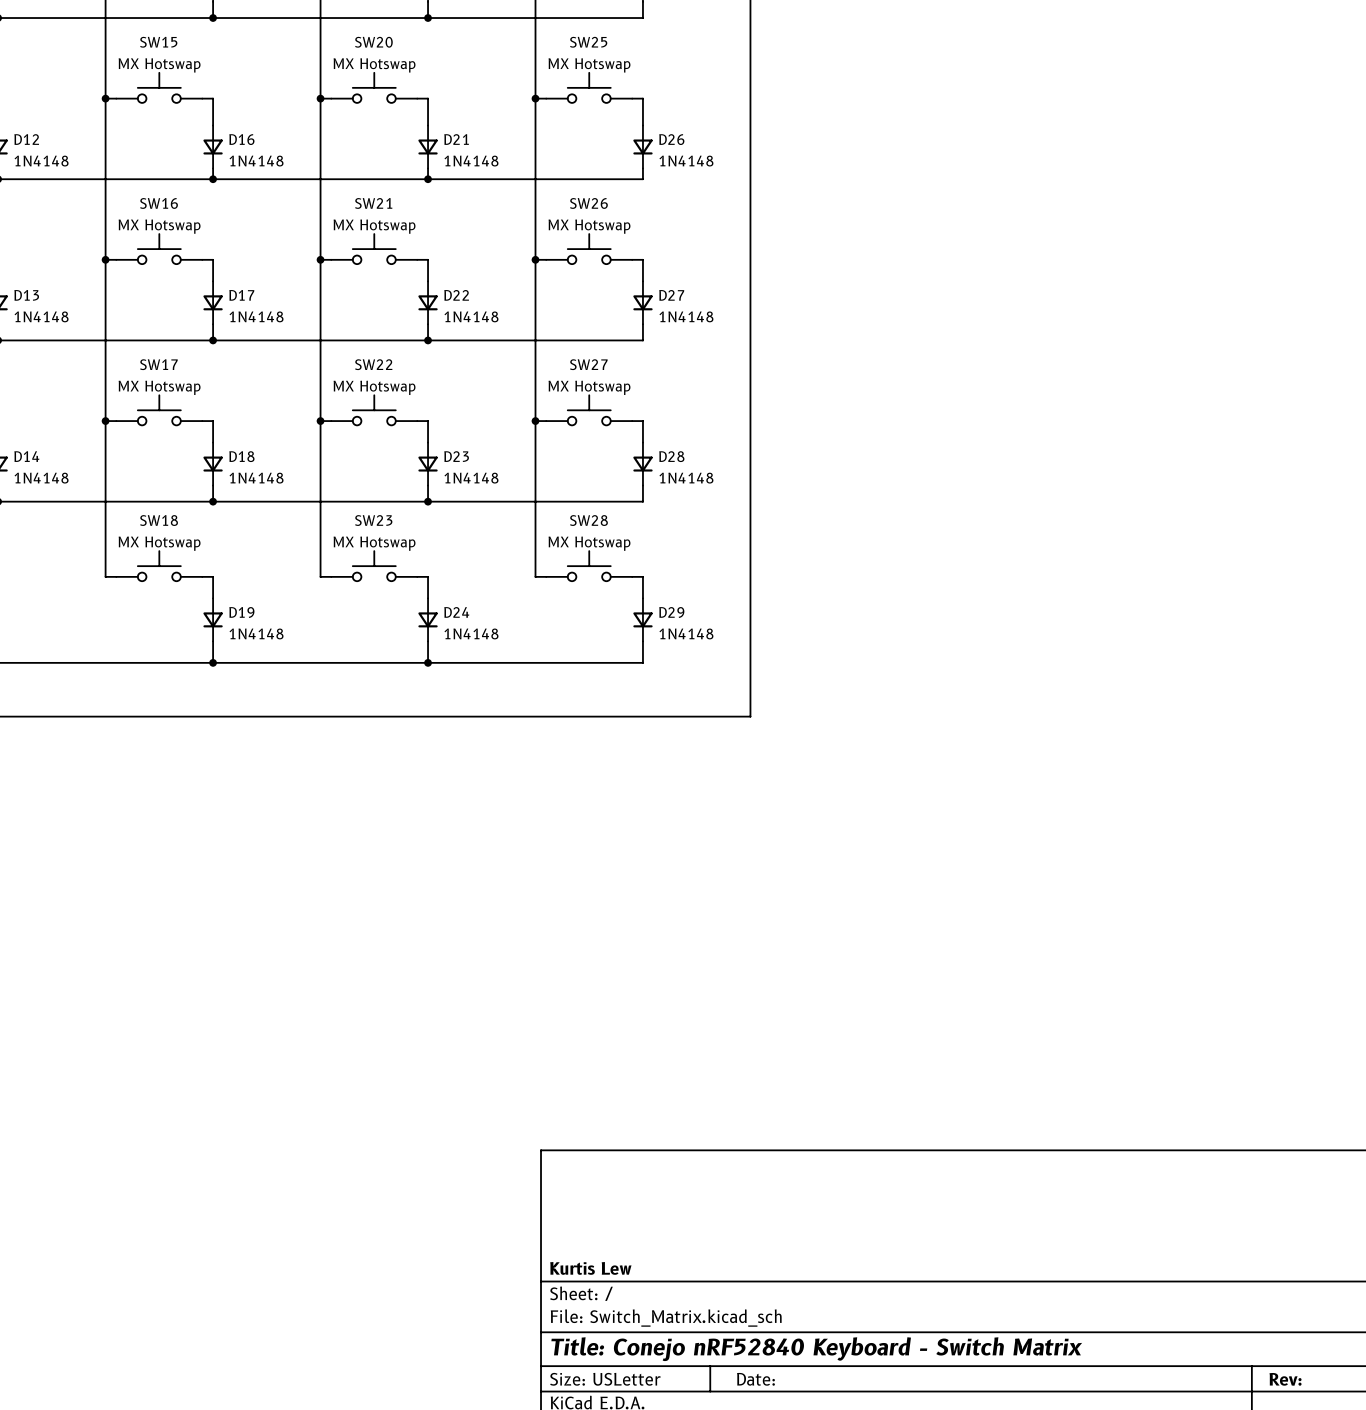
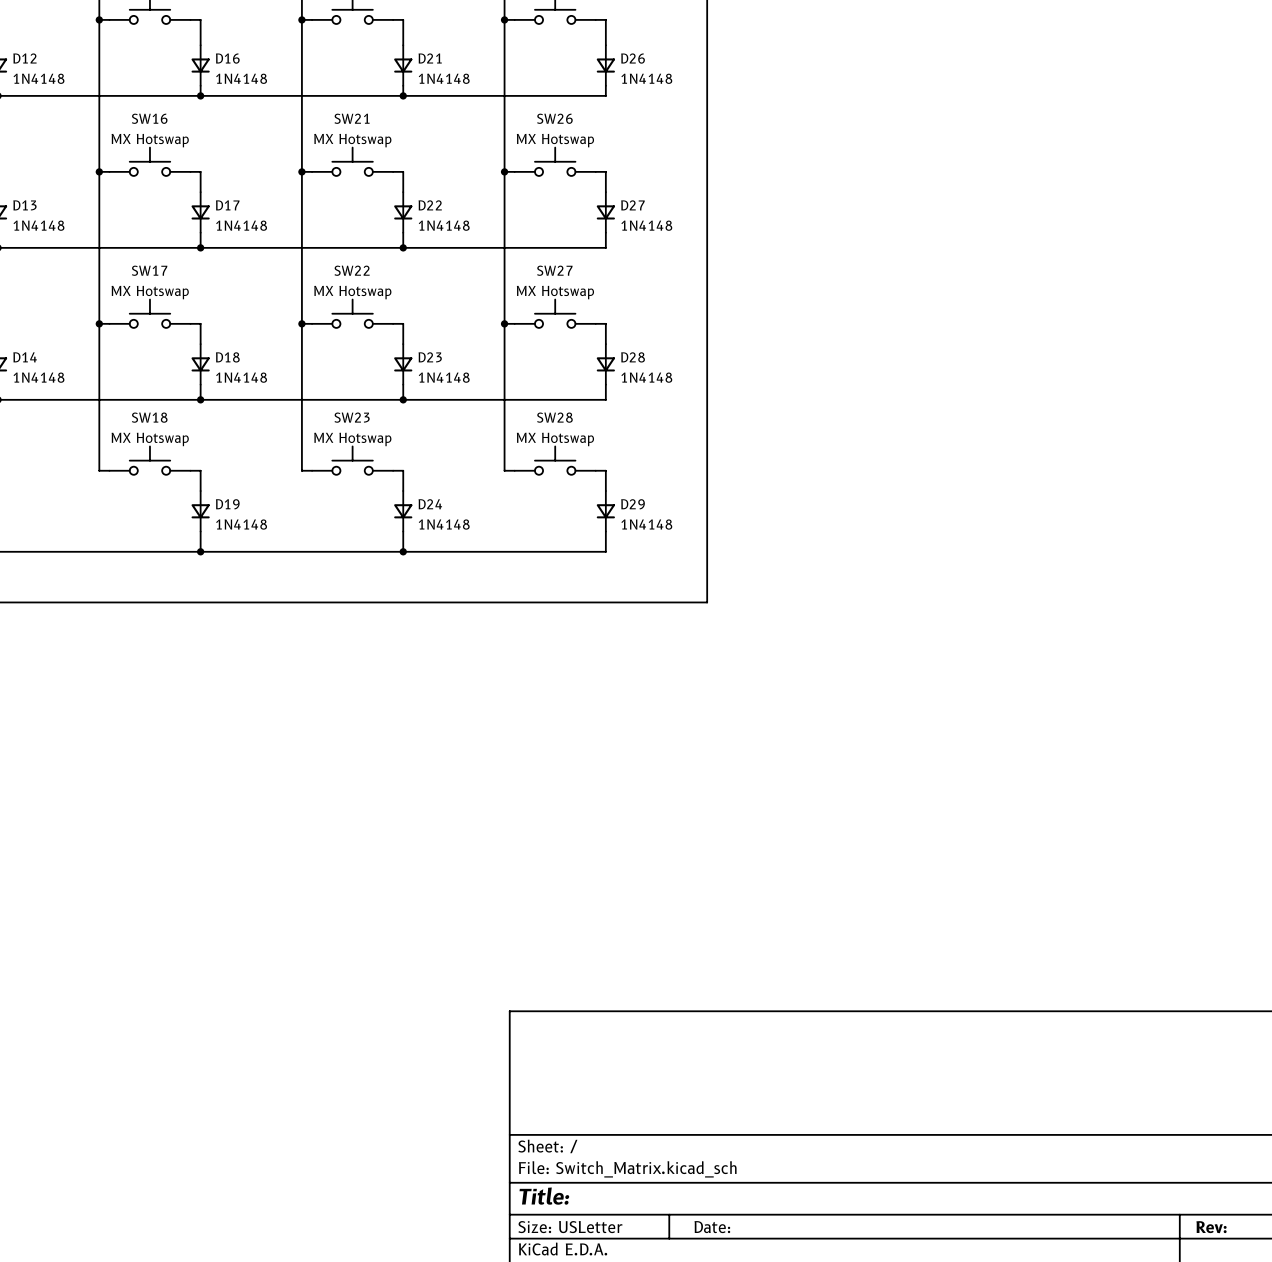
title block: Kurtis Lew (590, 1268) -> none
title block: Title: Conejo nRF52840 Keyboard - Switch Matrix (816, 1349) -> Title: (544, 1196)

